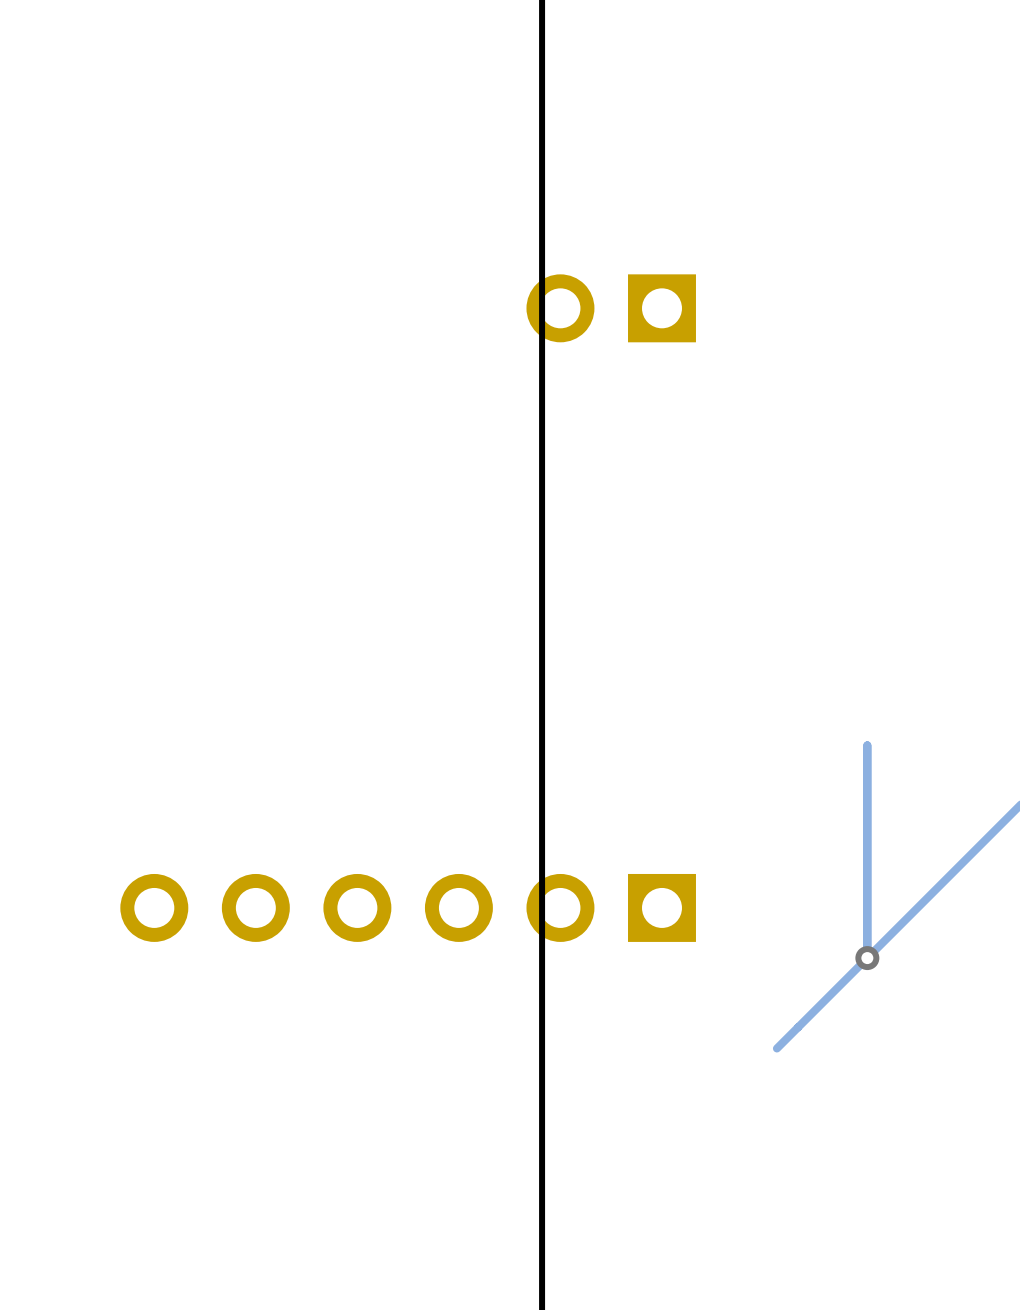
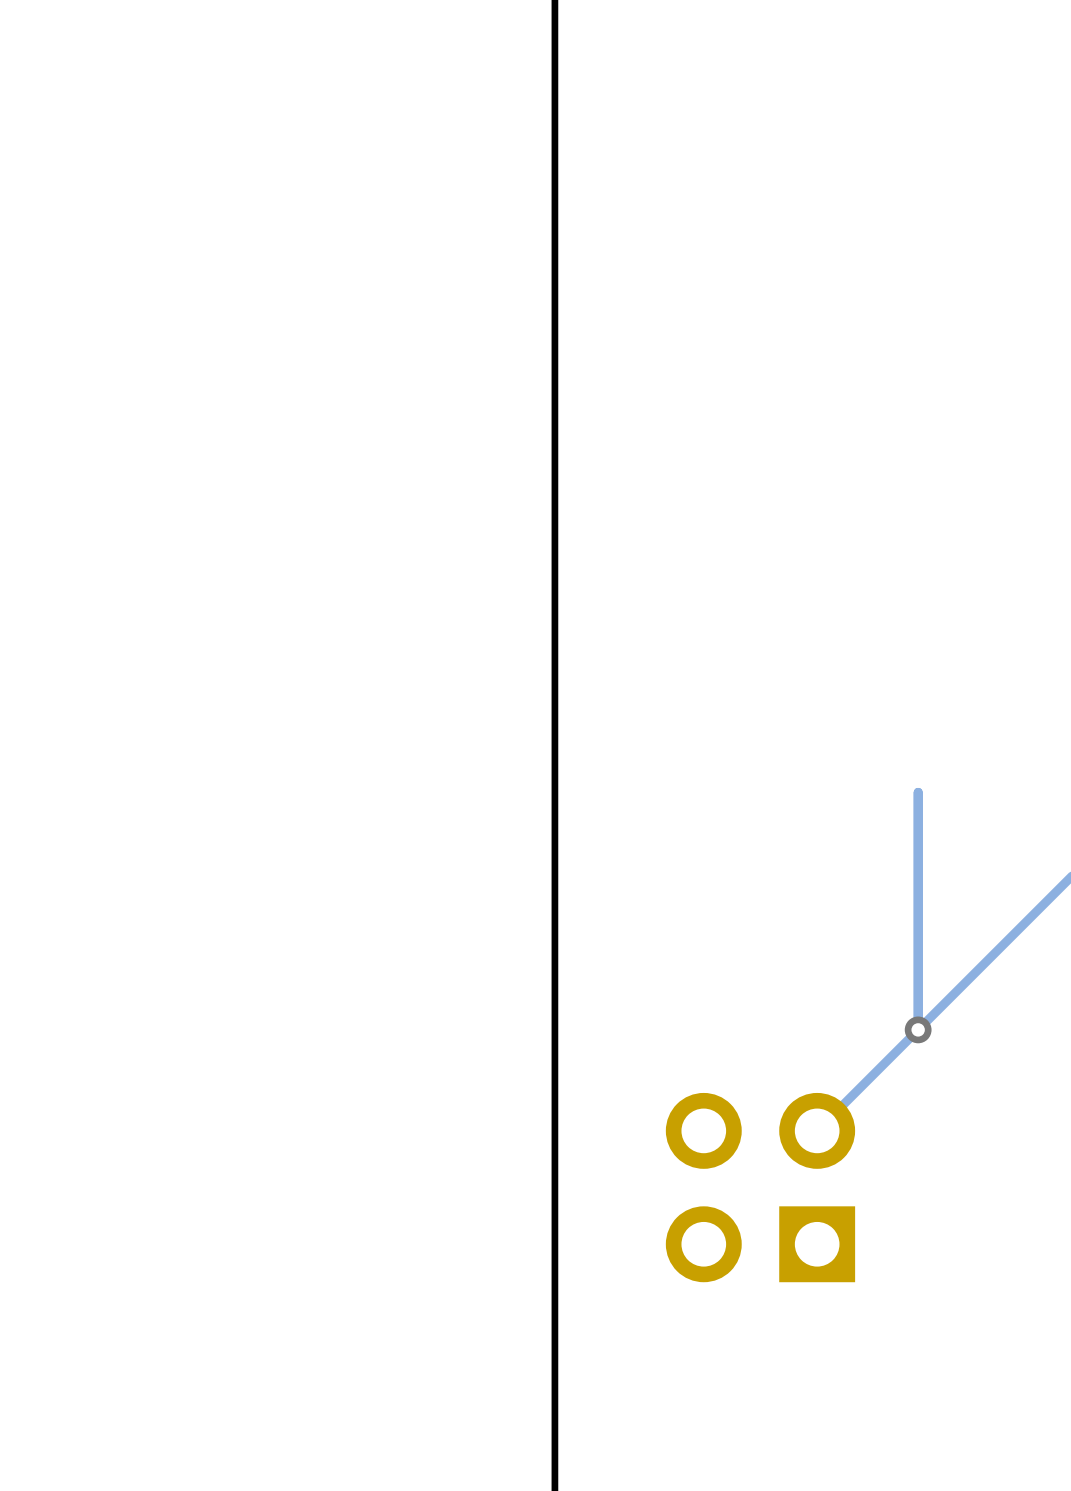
part: (611, 308) -> none
part: (408, 907) -> none
part: none -> (760, 1187)

